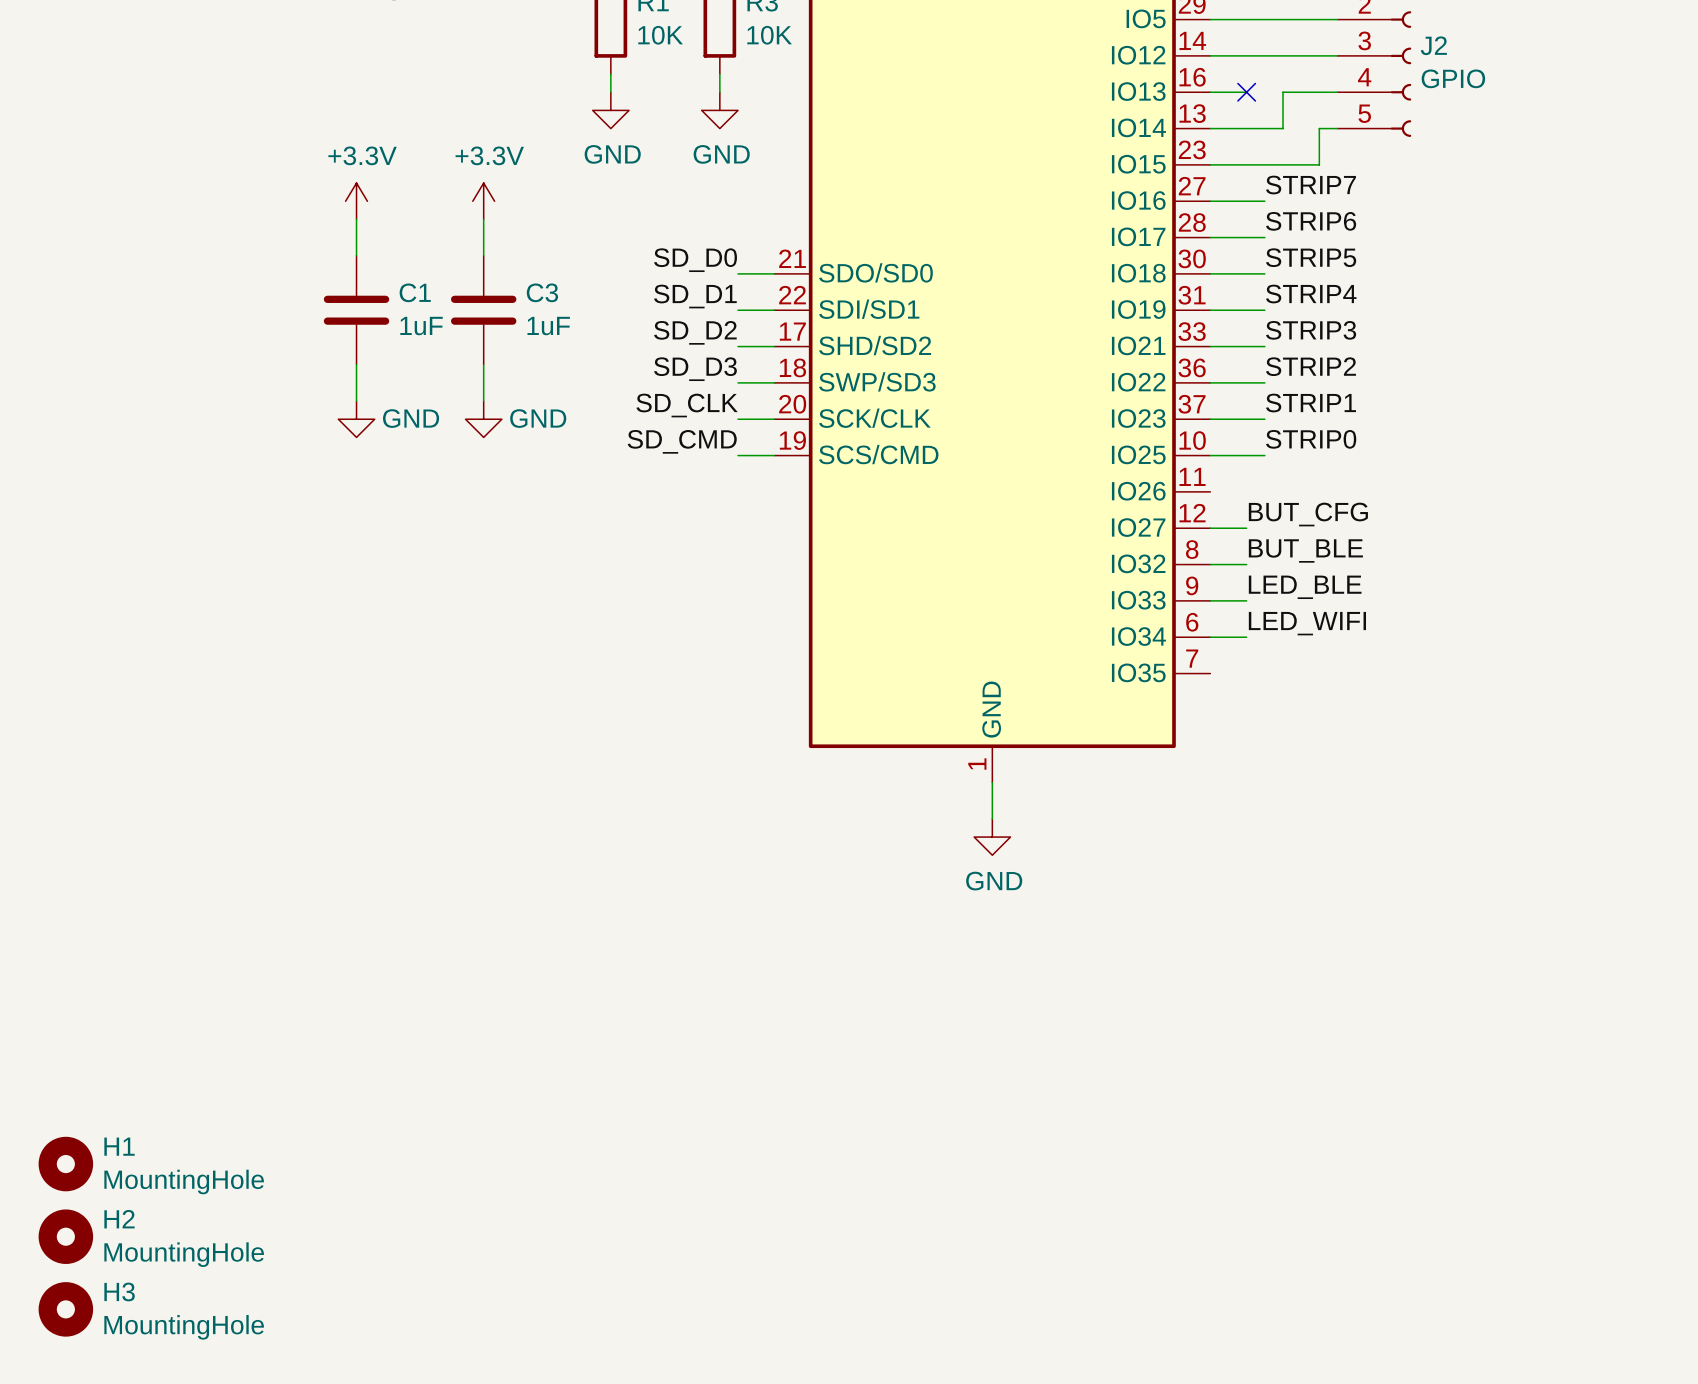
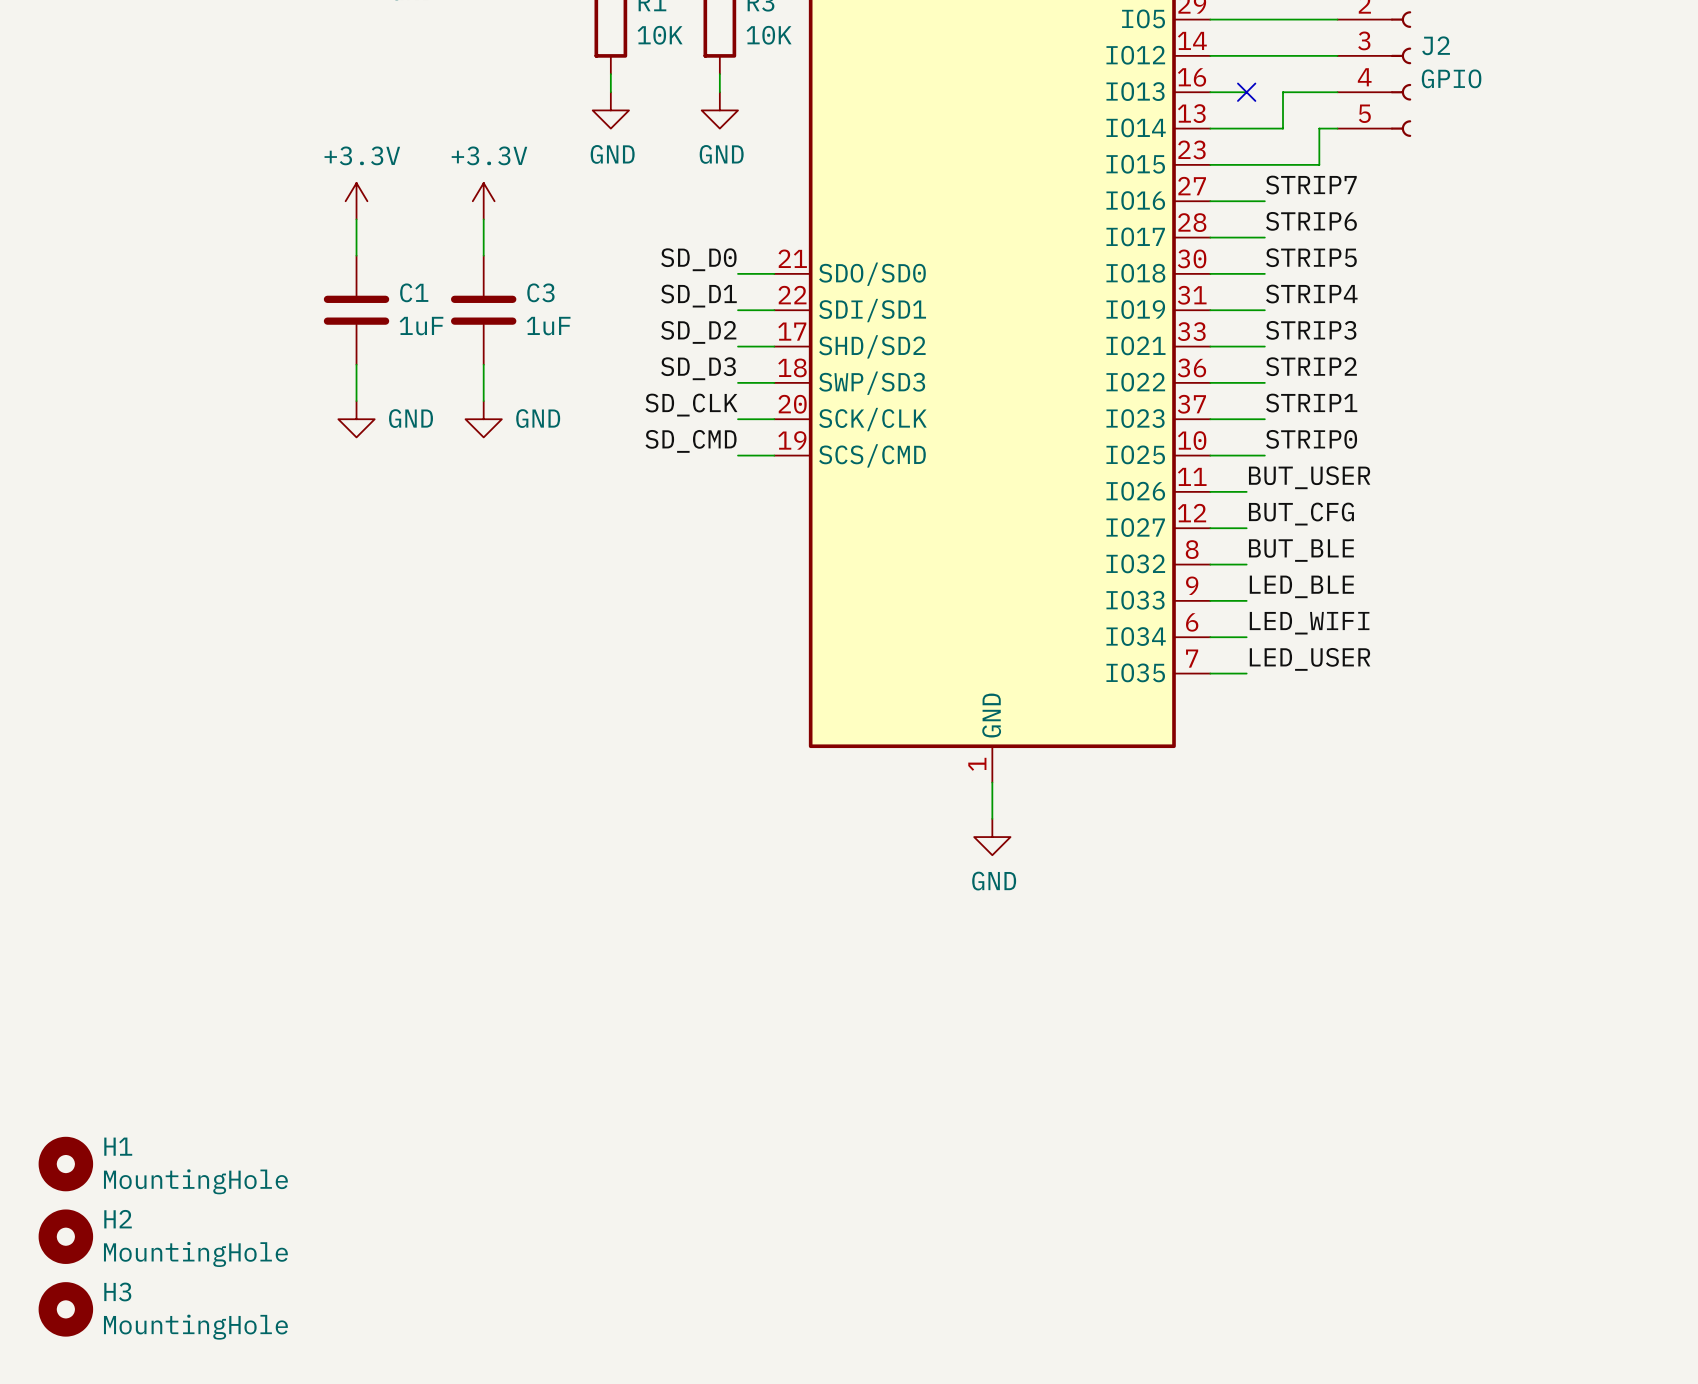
label: none -> BUT_USER (1309, 477)
wire: none -> (1210, 491) (1246, 491)
label: none -> LED_USER (1310, 659)
wire: none -> (1210, 673) (1246, 673)

